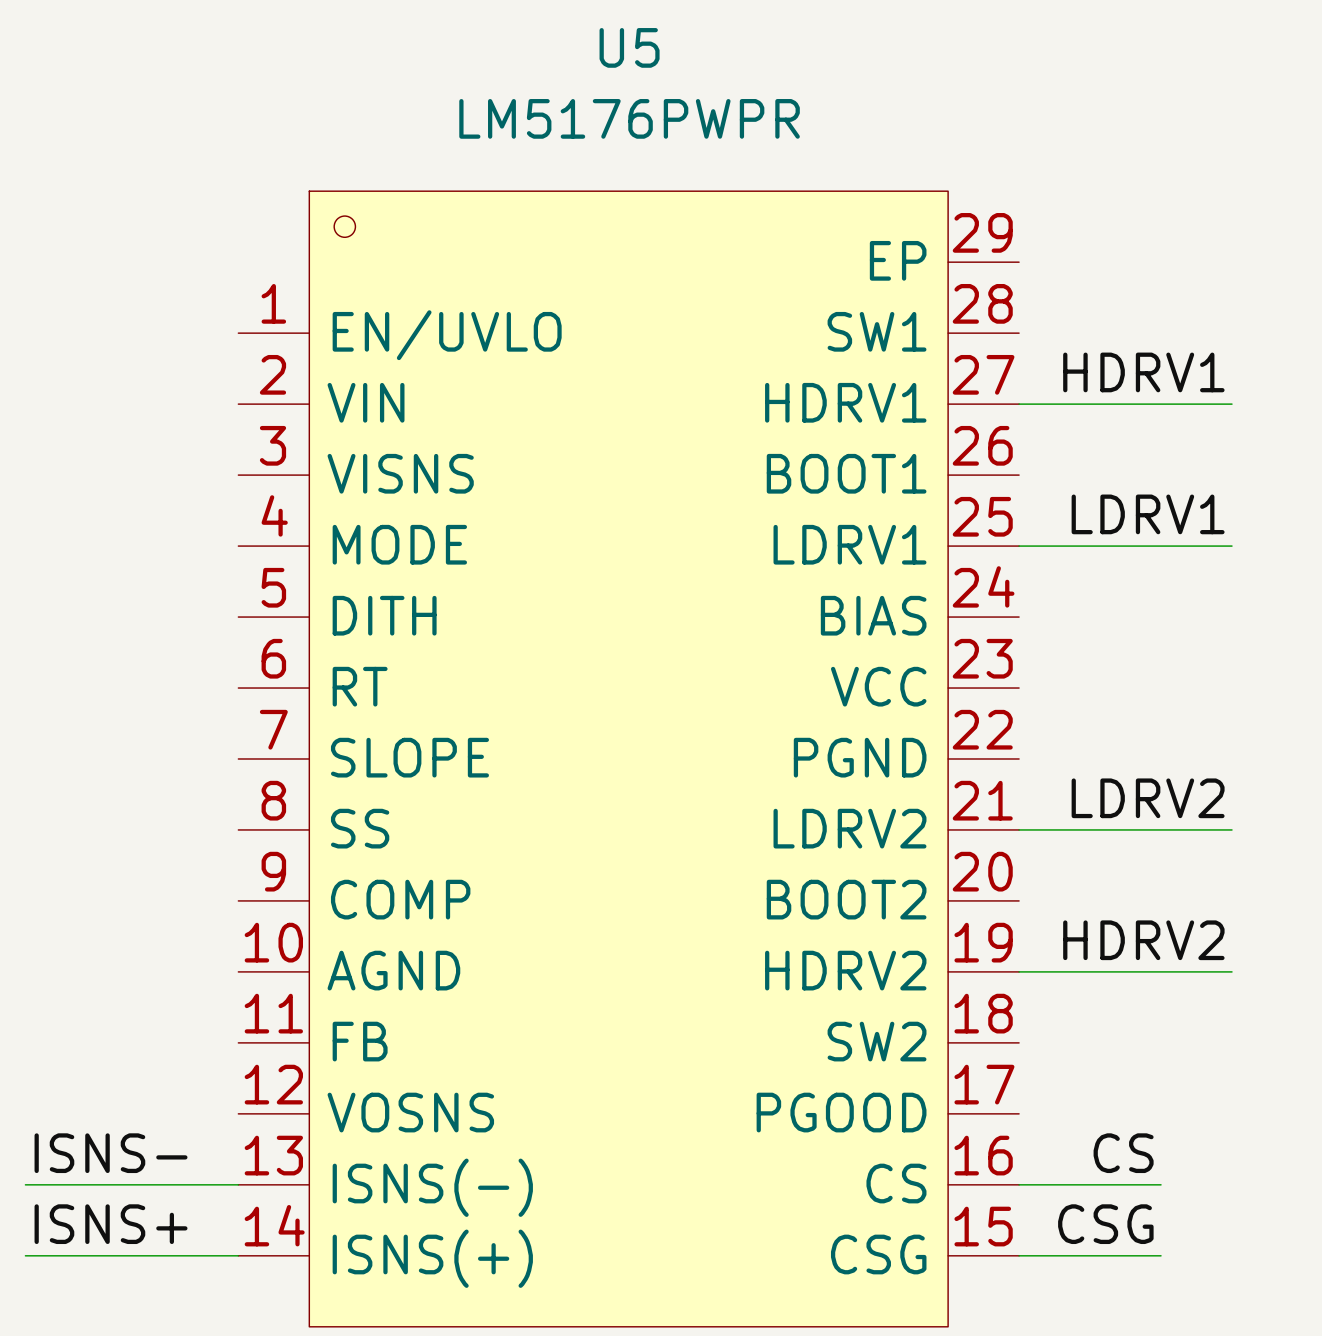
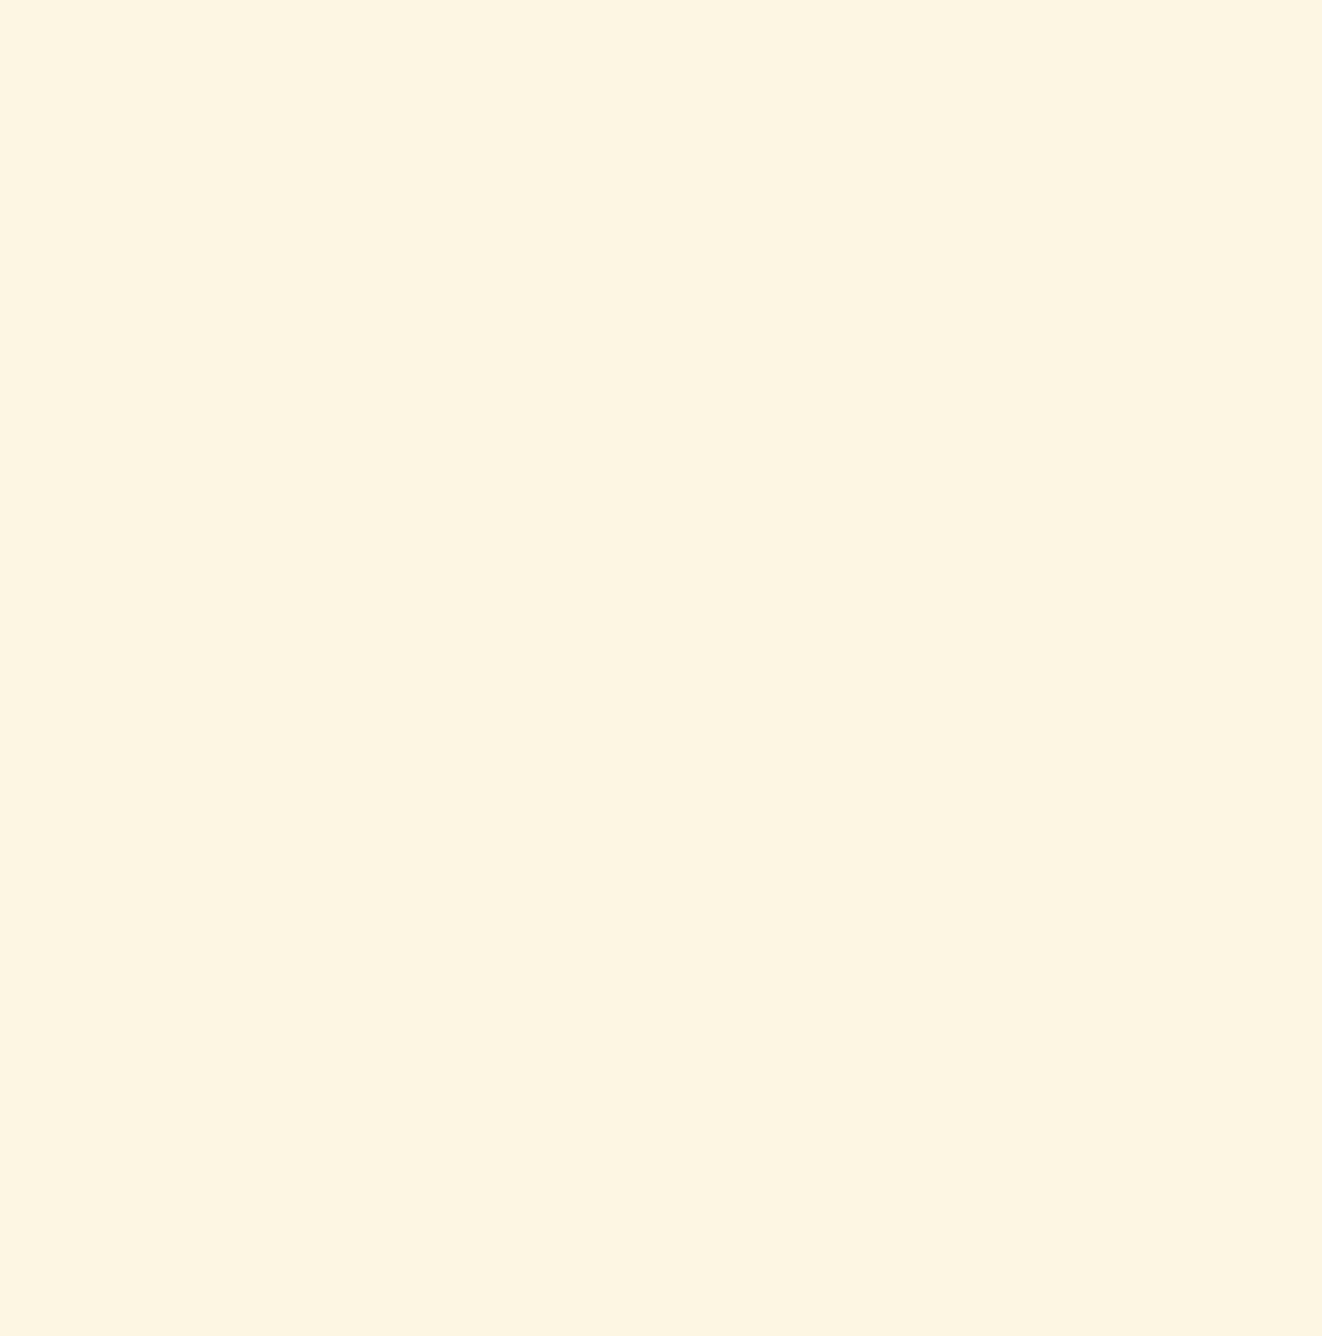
label: HDRV1 (1143, 372) -> none
wire: (1019, 404) (1232, 404) -> none
label: LDRV1 (1148, 514) -> none
wire: (1019, 546) (1232, 546) -> none
U5: LM5176PWPR (628, 758) -> none
label: LDRV2 (1148, 798) -> none
wire: (1019, 829) (1232, 829) -> none
label: HDRV2 (1143, 940) -> none
wire: (1019, 971) (1232, 971) -> none
label: ISNS- (111, 1153) -> none
label: CS (1123, 1153) -> none
wire: (25, 1184) (238, 1184) -> none
wire: (1019, 1184) (1161, 1184) -> none
label: ISNS+ (111, 1224) -> none
label: CSG (1105, 1224) -> none
wire: (25, 1255) (238, 1255) -> none
wire: (1019, 1255) (1161, 1255) -> none

